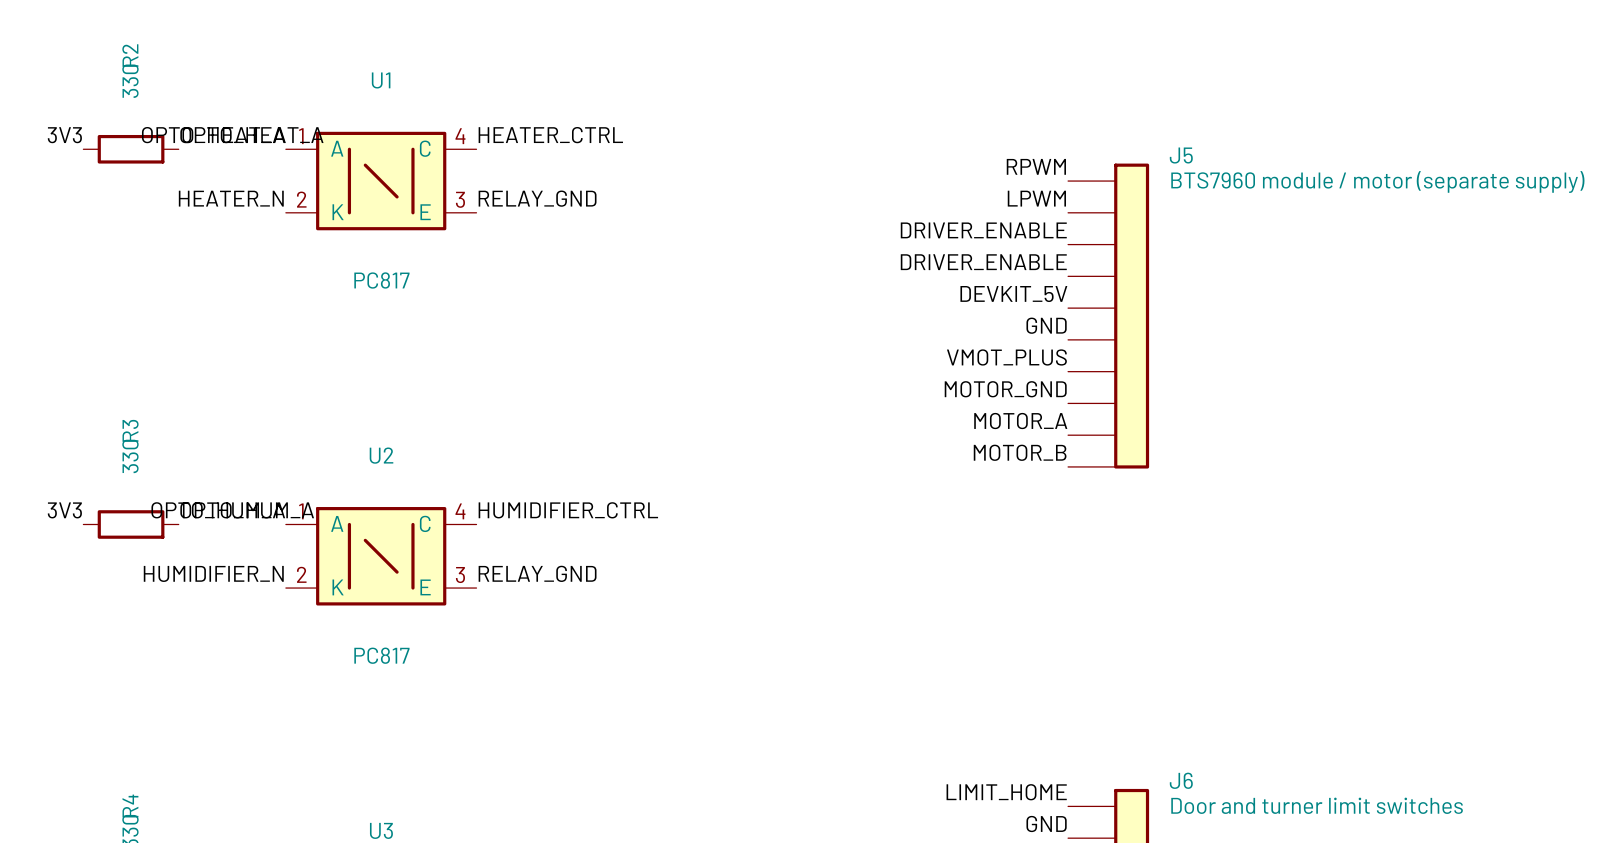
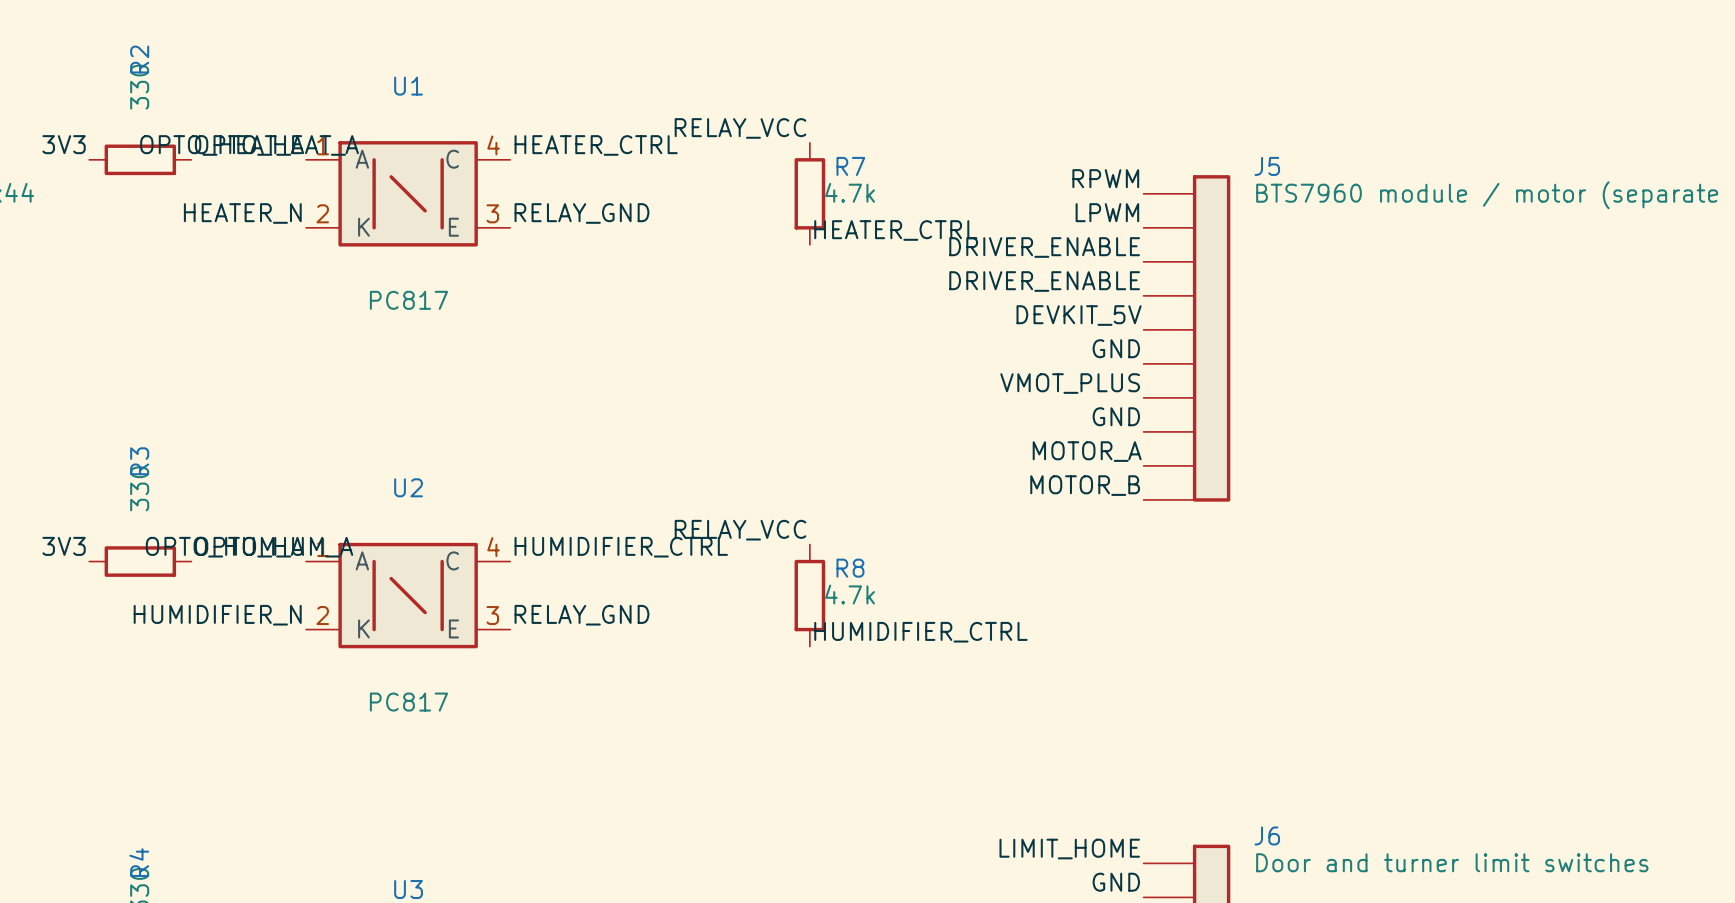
label: none -> RELAY_VCC (740, 128)
R7: none -> 4.7k (809, 193)
label: none -> HEATER_CTRL (895, 230)
label: MOTOR_GND (1005, 389) -> GND (1116, 416)
label: none -> RELAY_VCC (740, 530)
R8: none -> 4.7k (809, 595)
label: none -> HUMIDIFIER_CTRL (920, 632)

